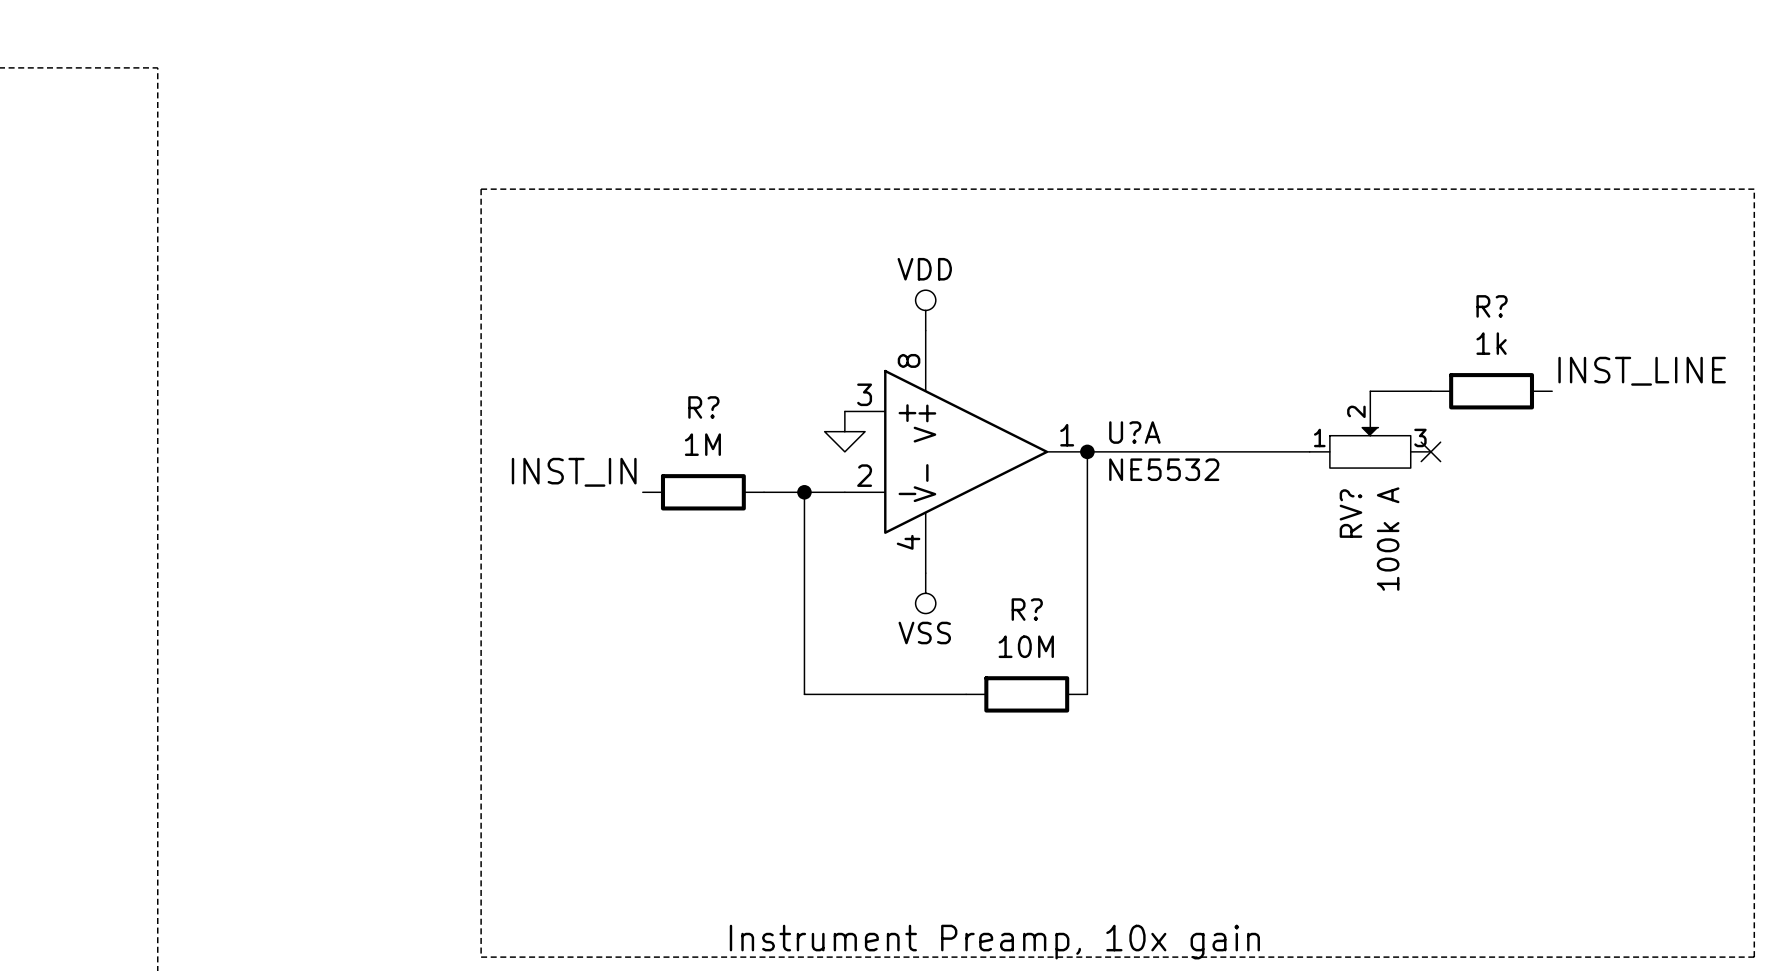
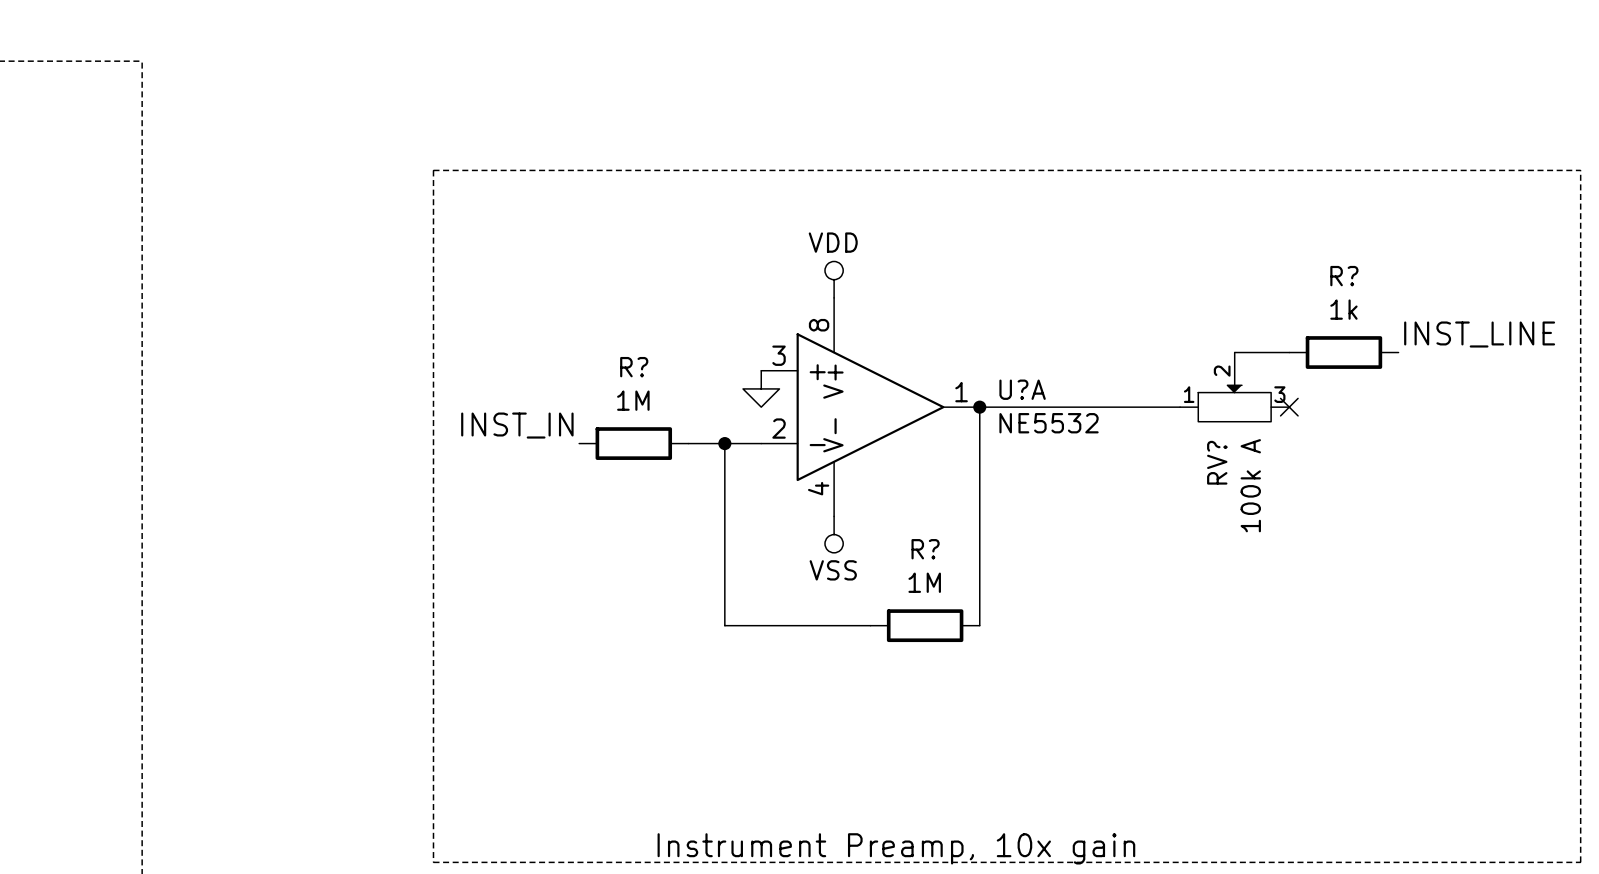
R? value: 10M (1026, 646) -> 1M (924, 582)

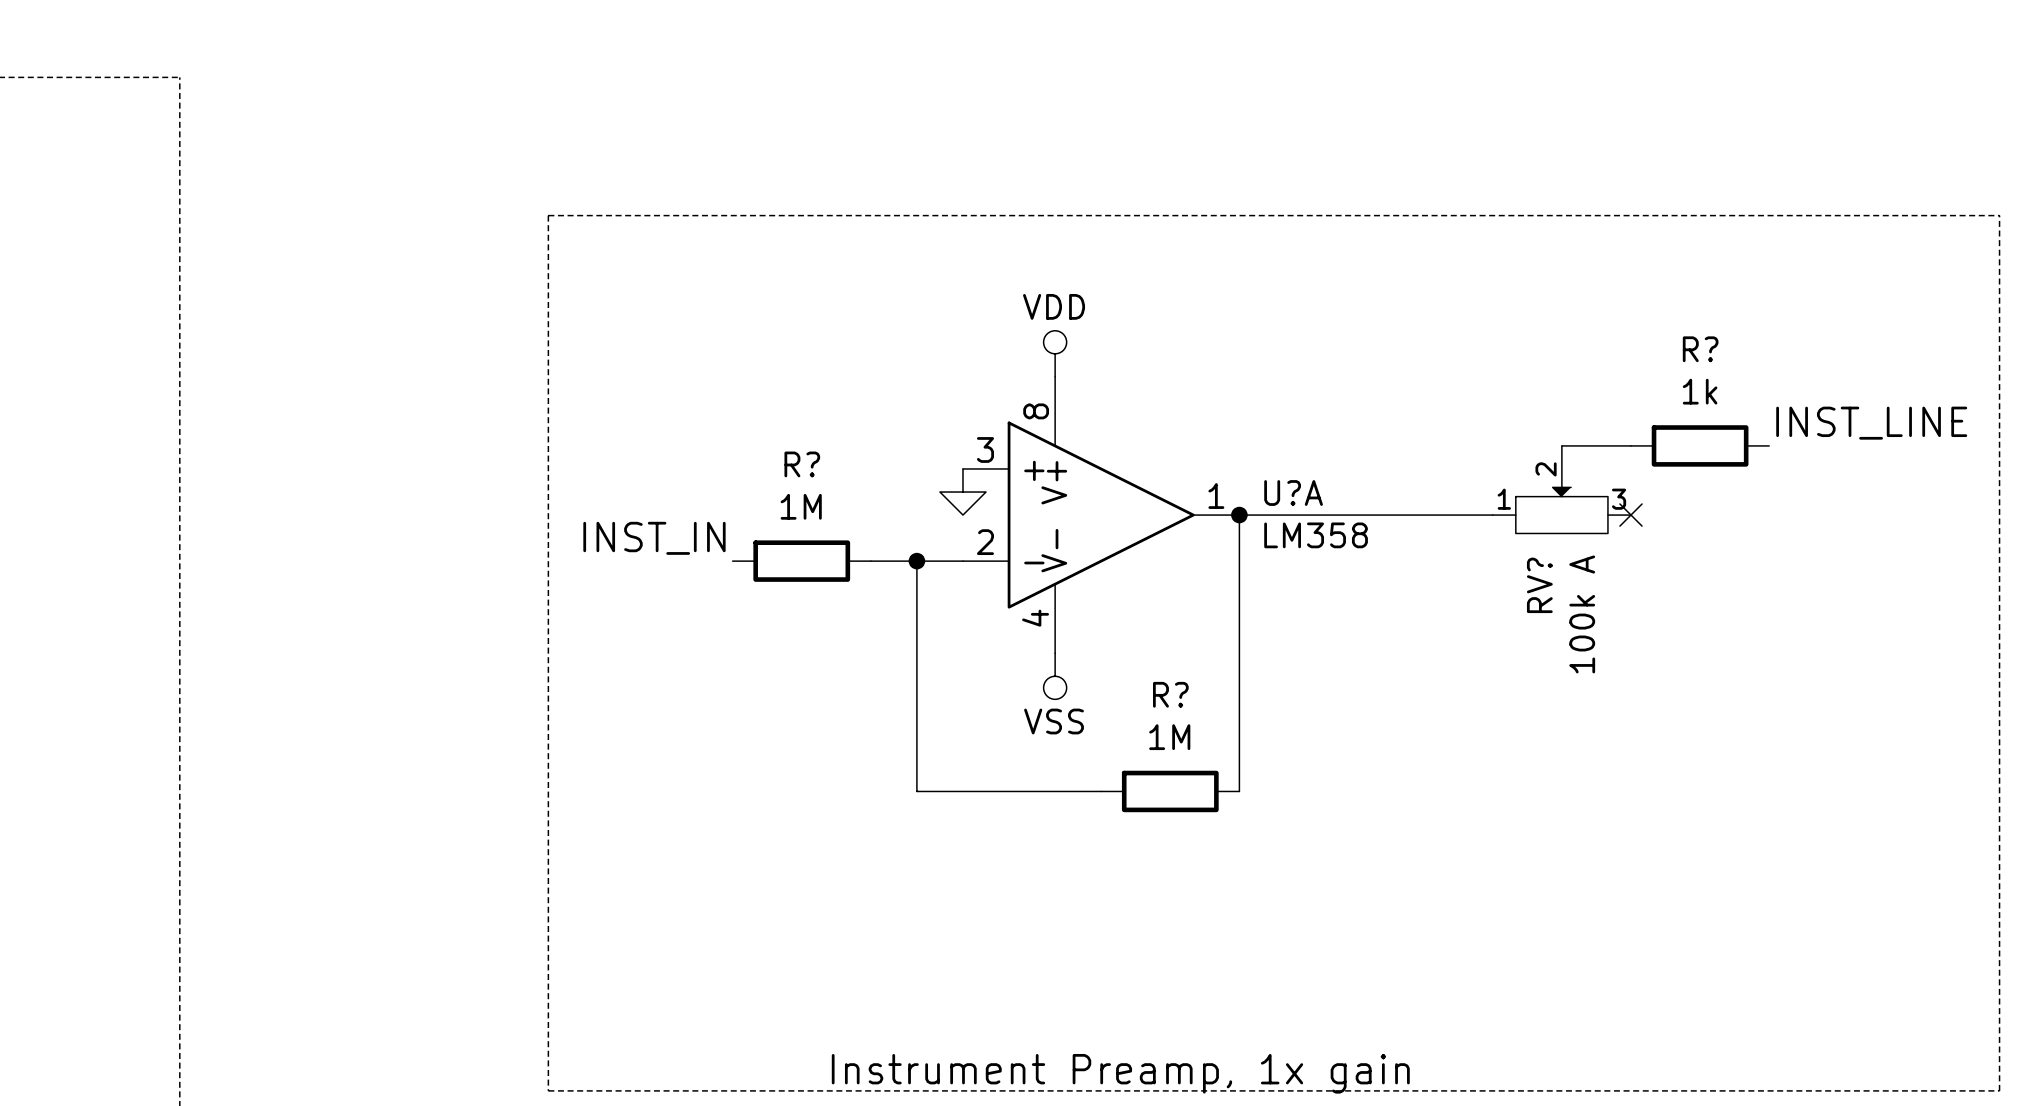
U?A value: NE5532 (1049, 423) -> LM358 (1316, 535)
text: Instrument Preamp, 10x gain (896, 848) -> Instrument Preamp, 1x gain (1120, 1073)

